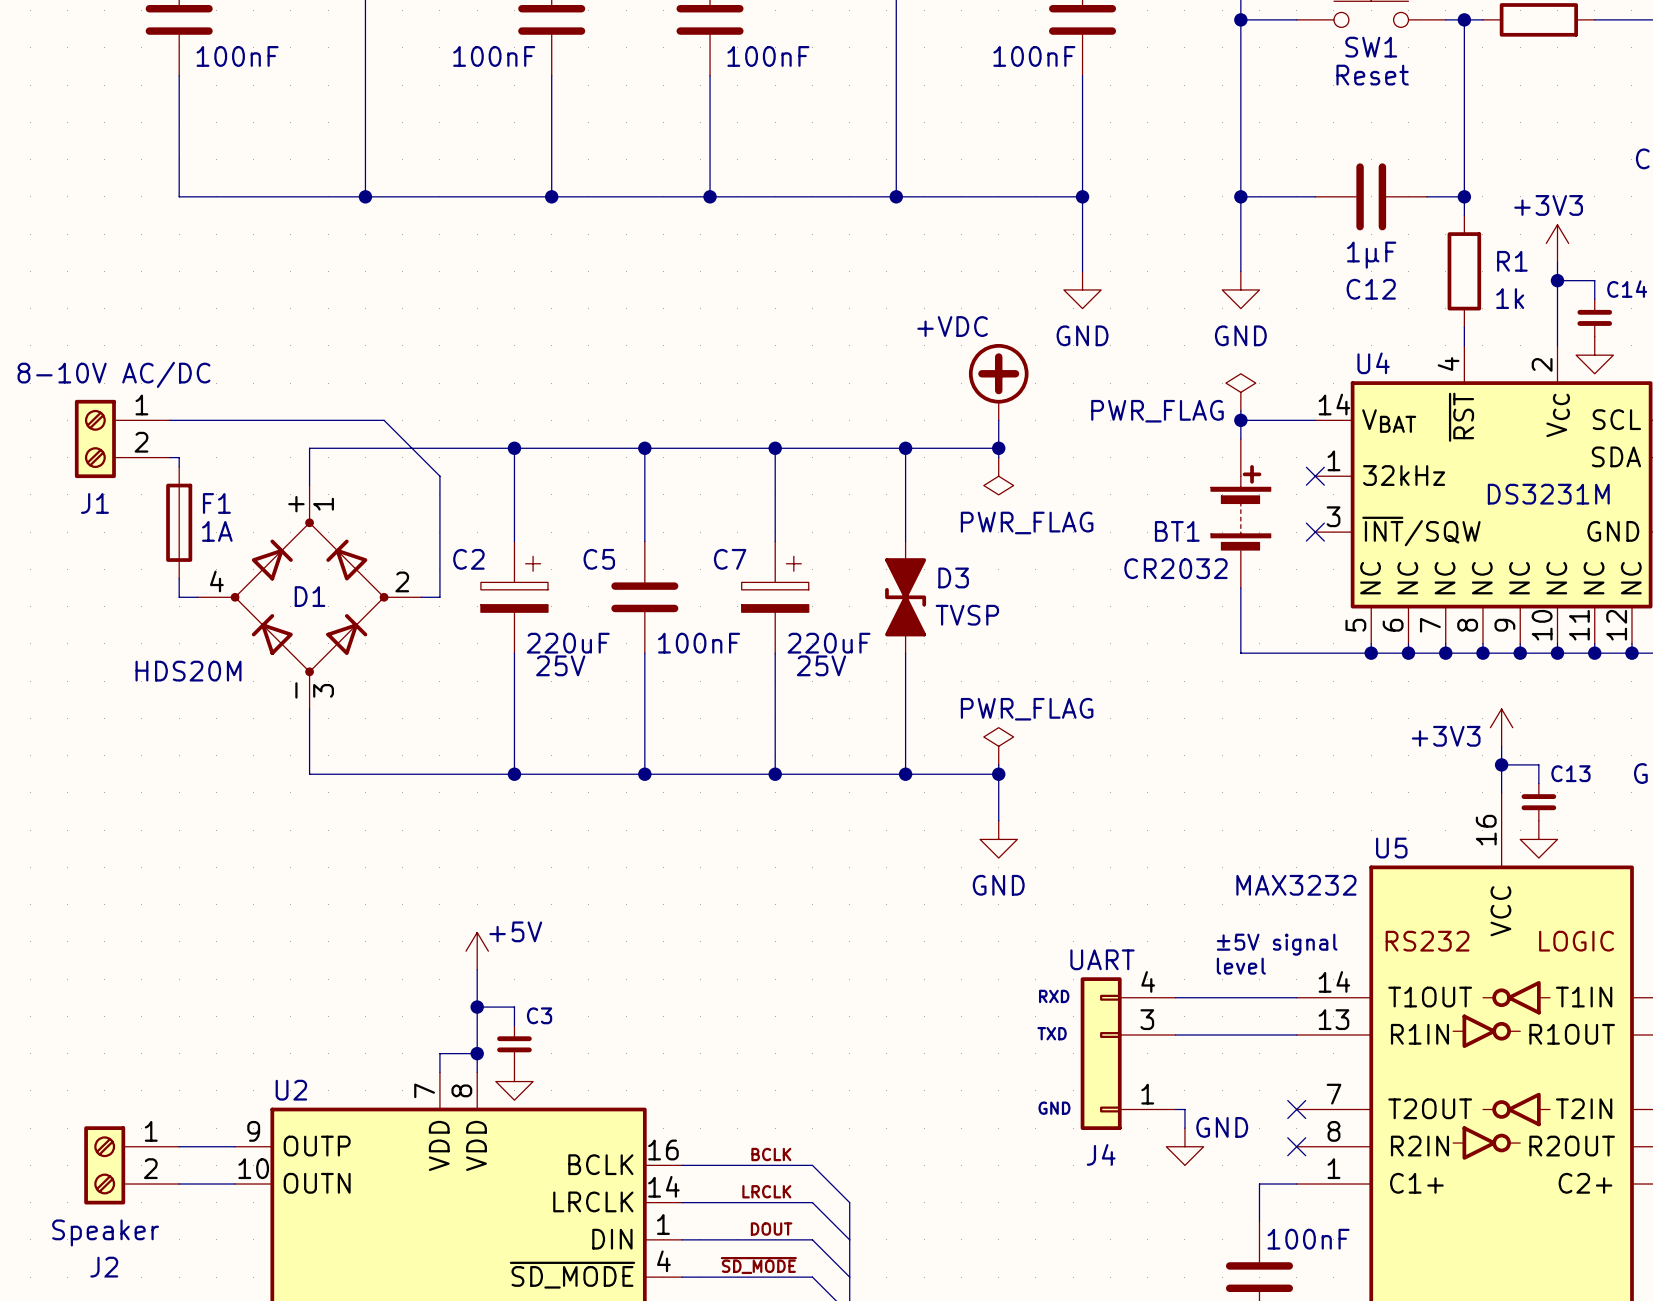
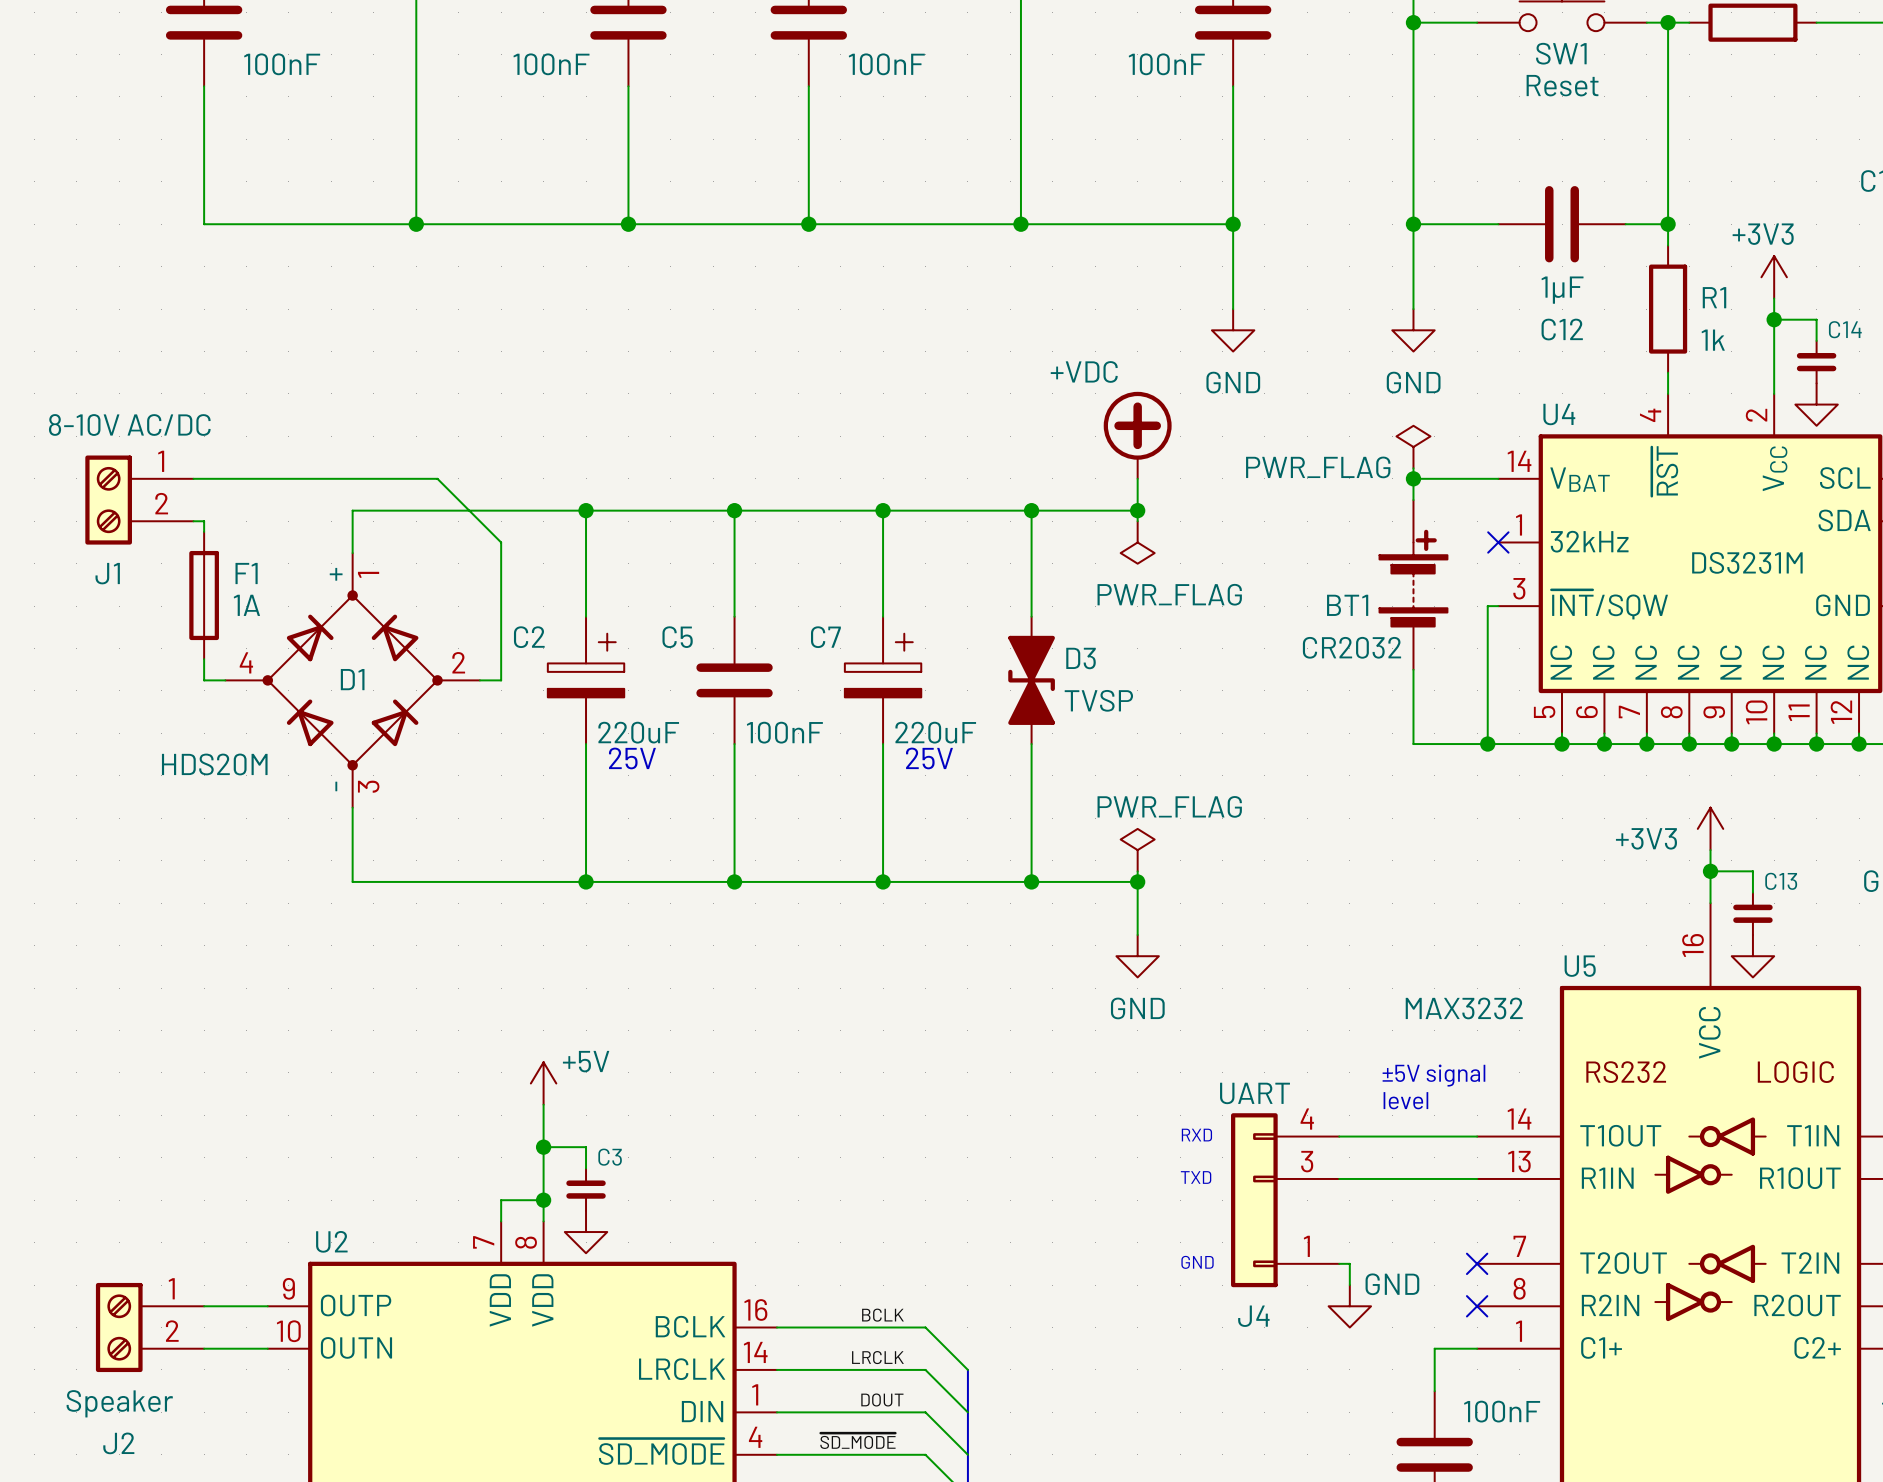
wire: none -> (1498, 606) (1487, 606) (1487, 744)
no-connect mark: (1315, 532) -> none
junction: none -> (1487, 744)

